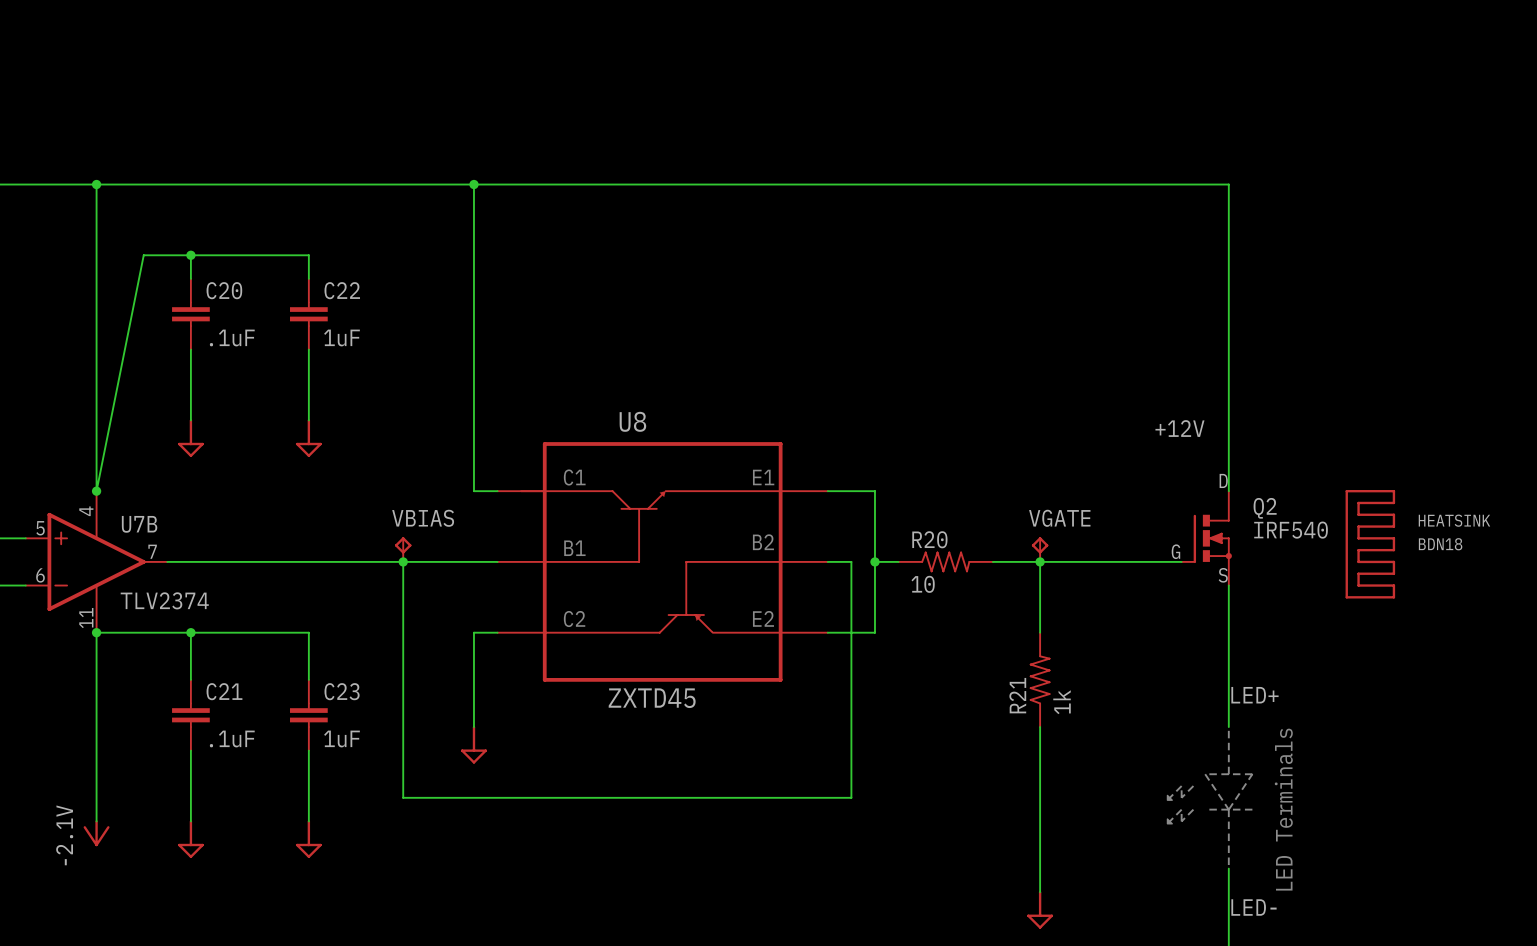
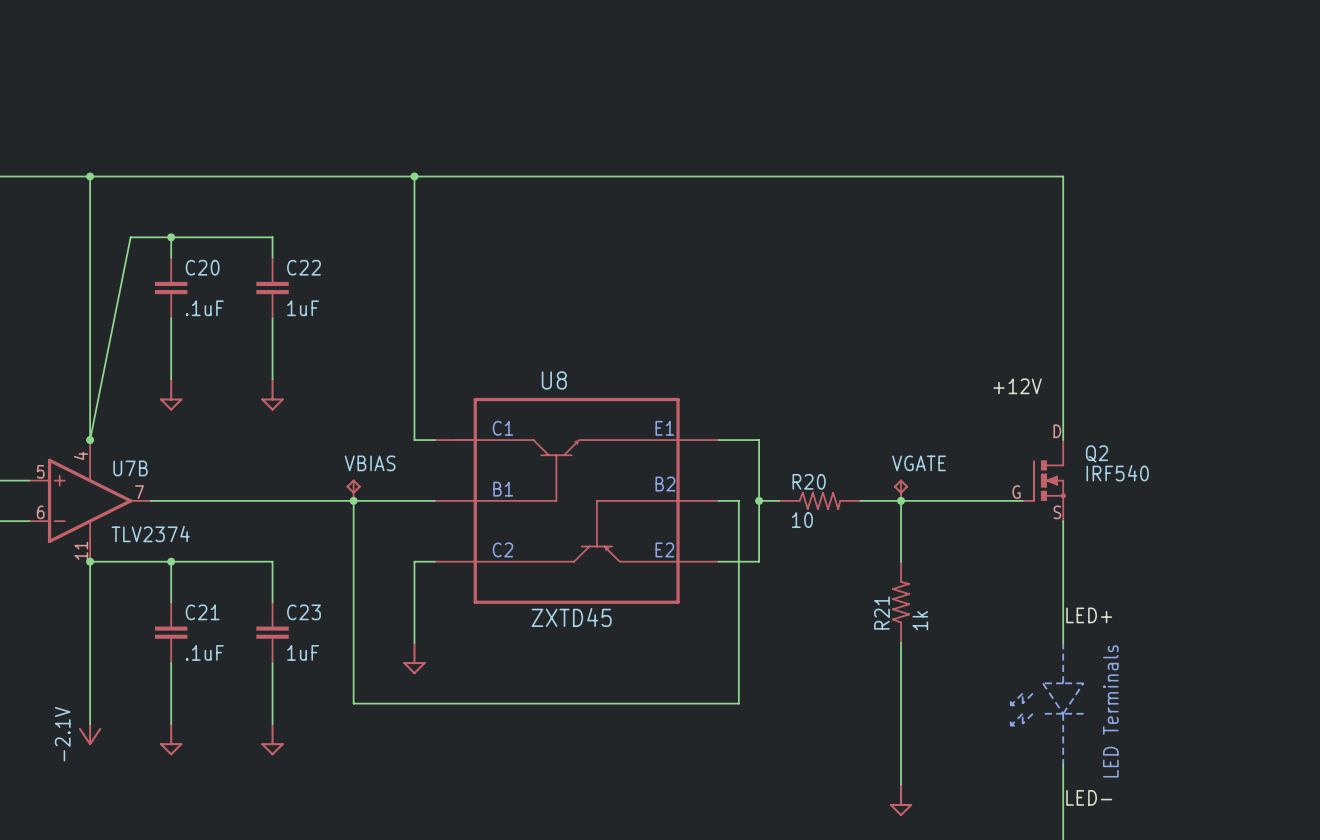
HEATSINK: BDN18 (1370, 544) -> none

